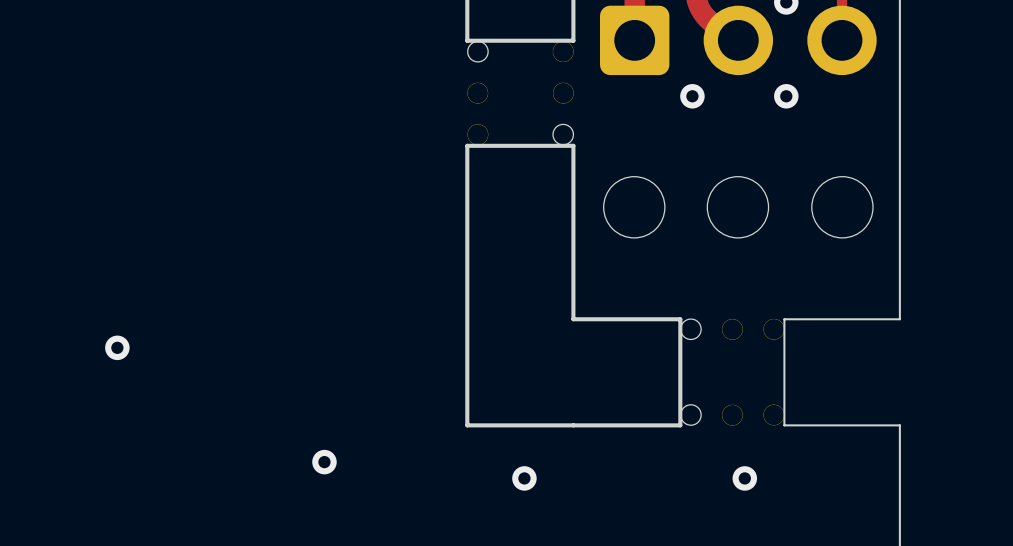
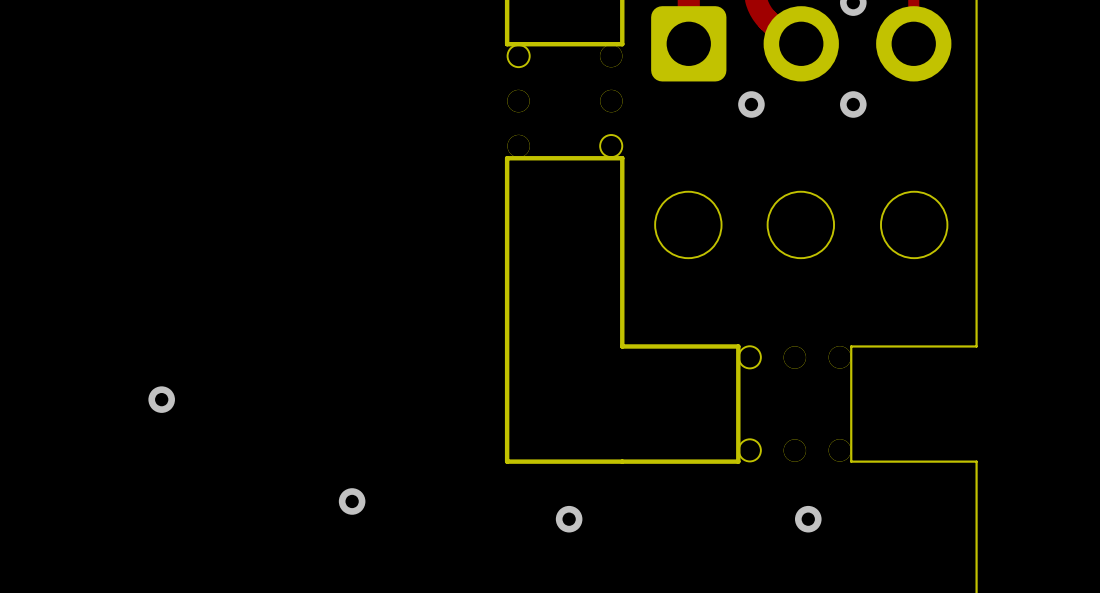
via position: (117, 347) -> (161, 399)

